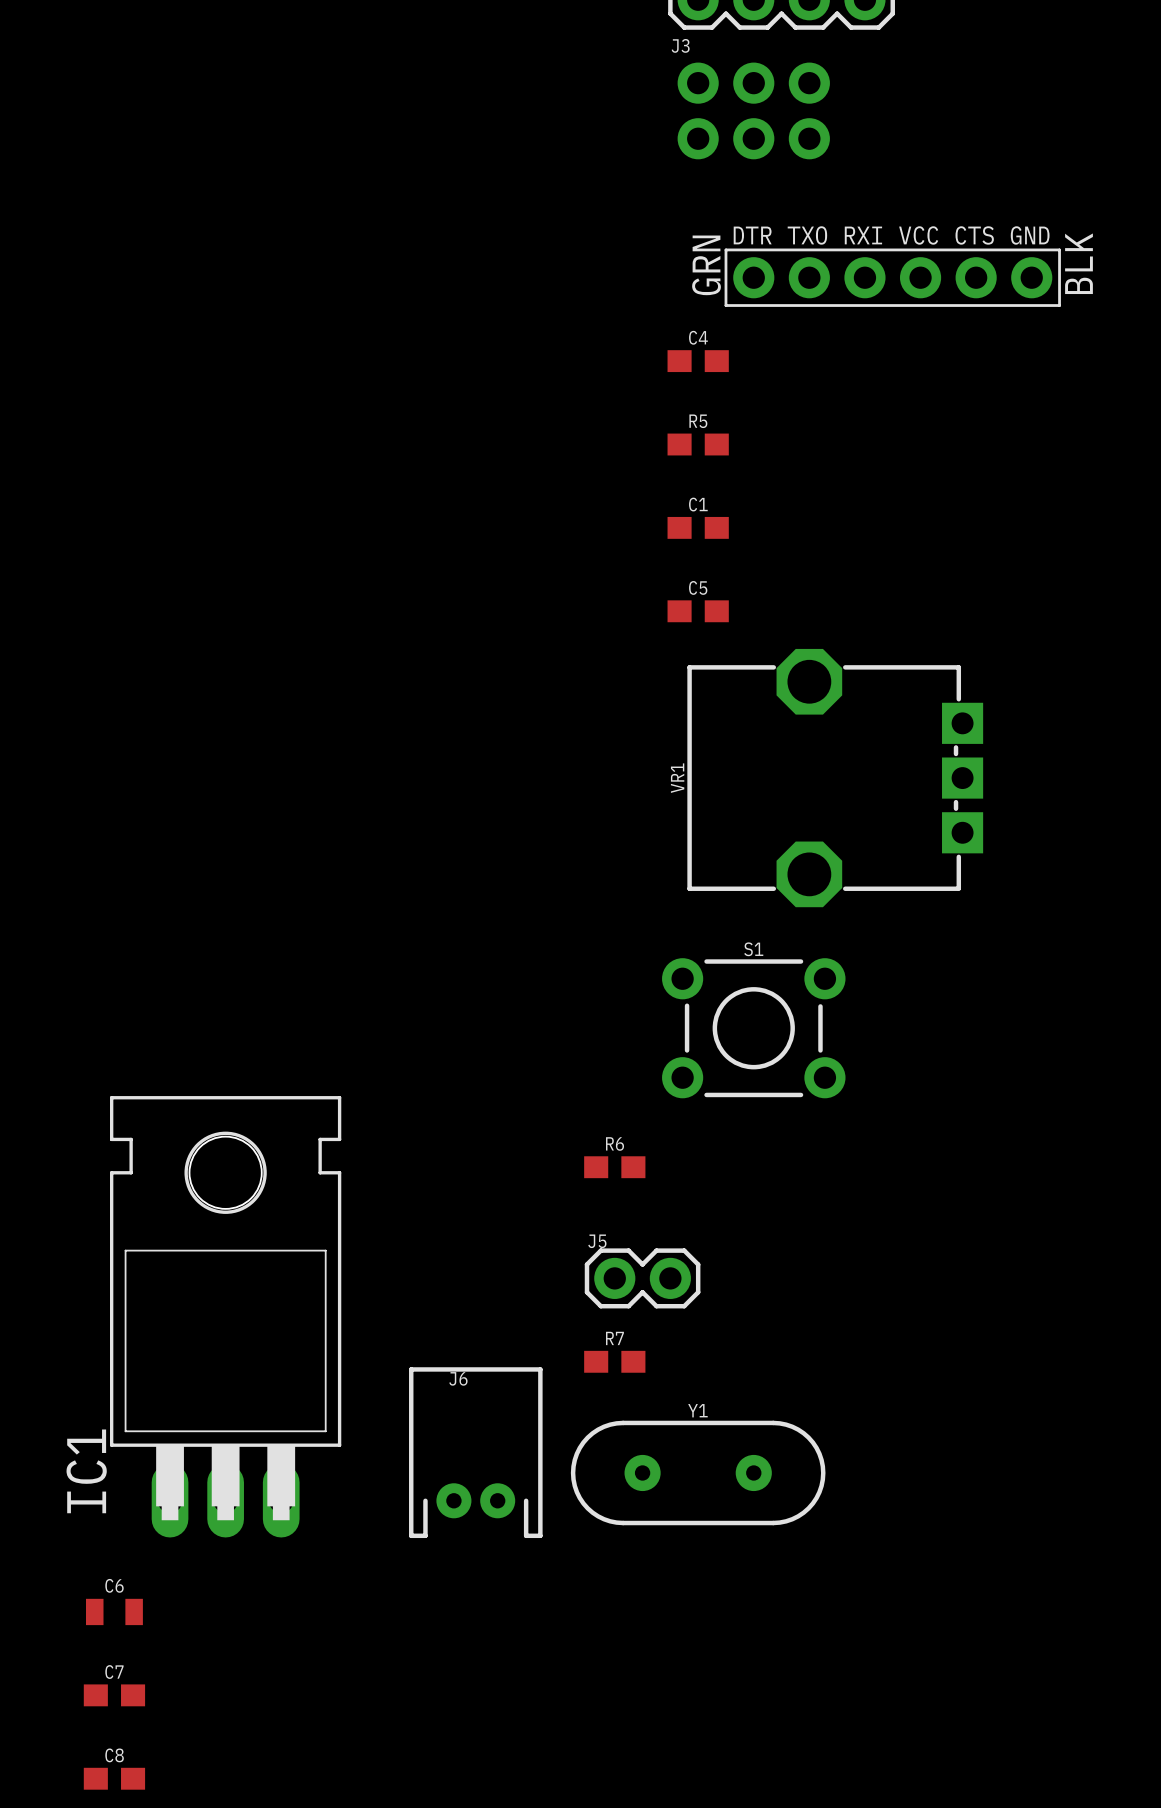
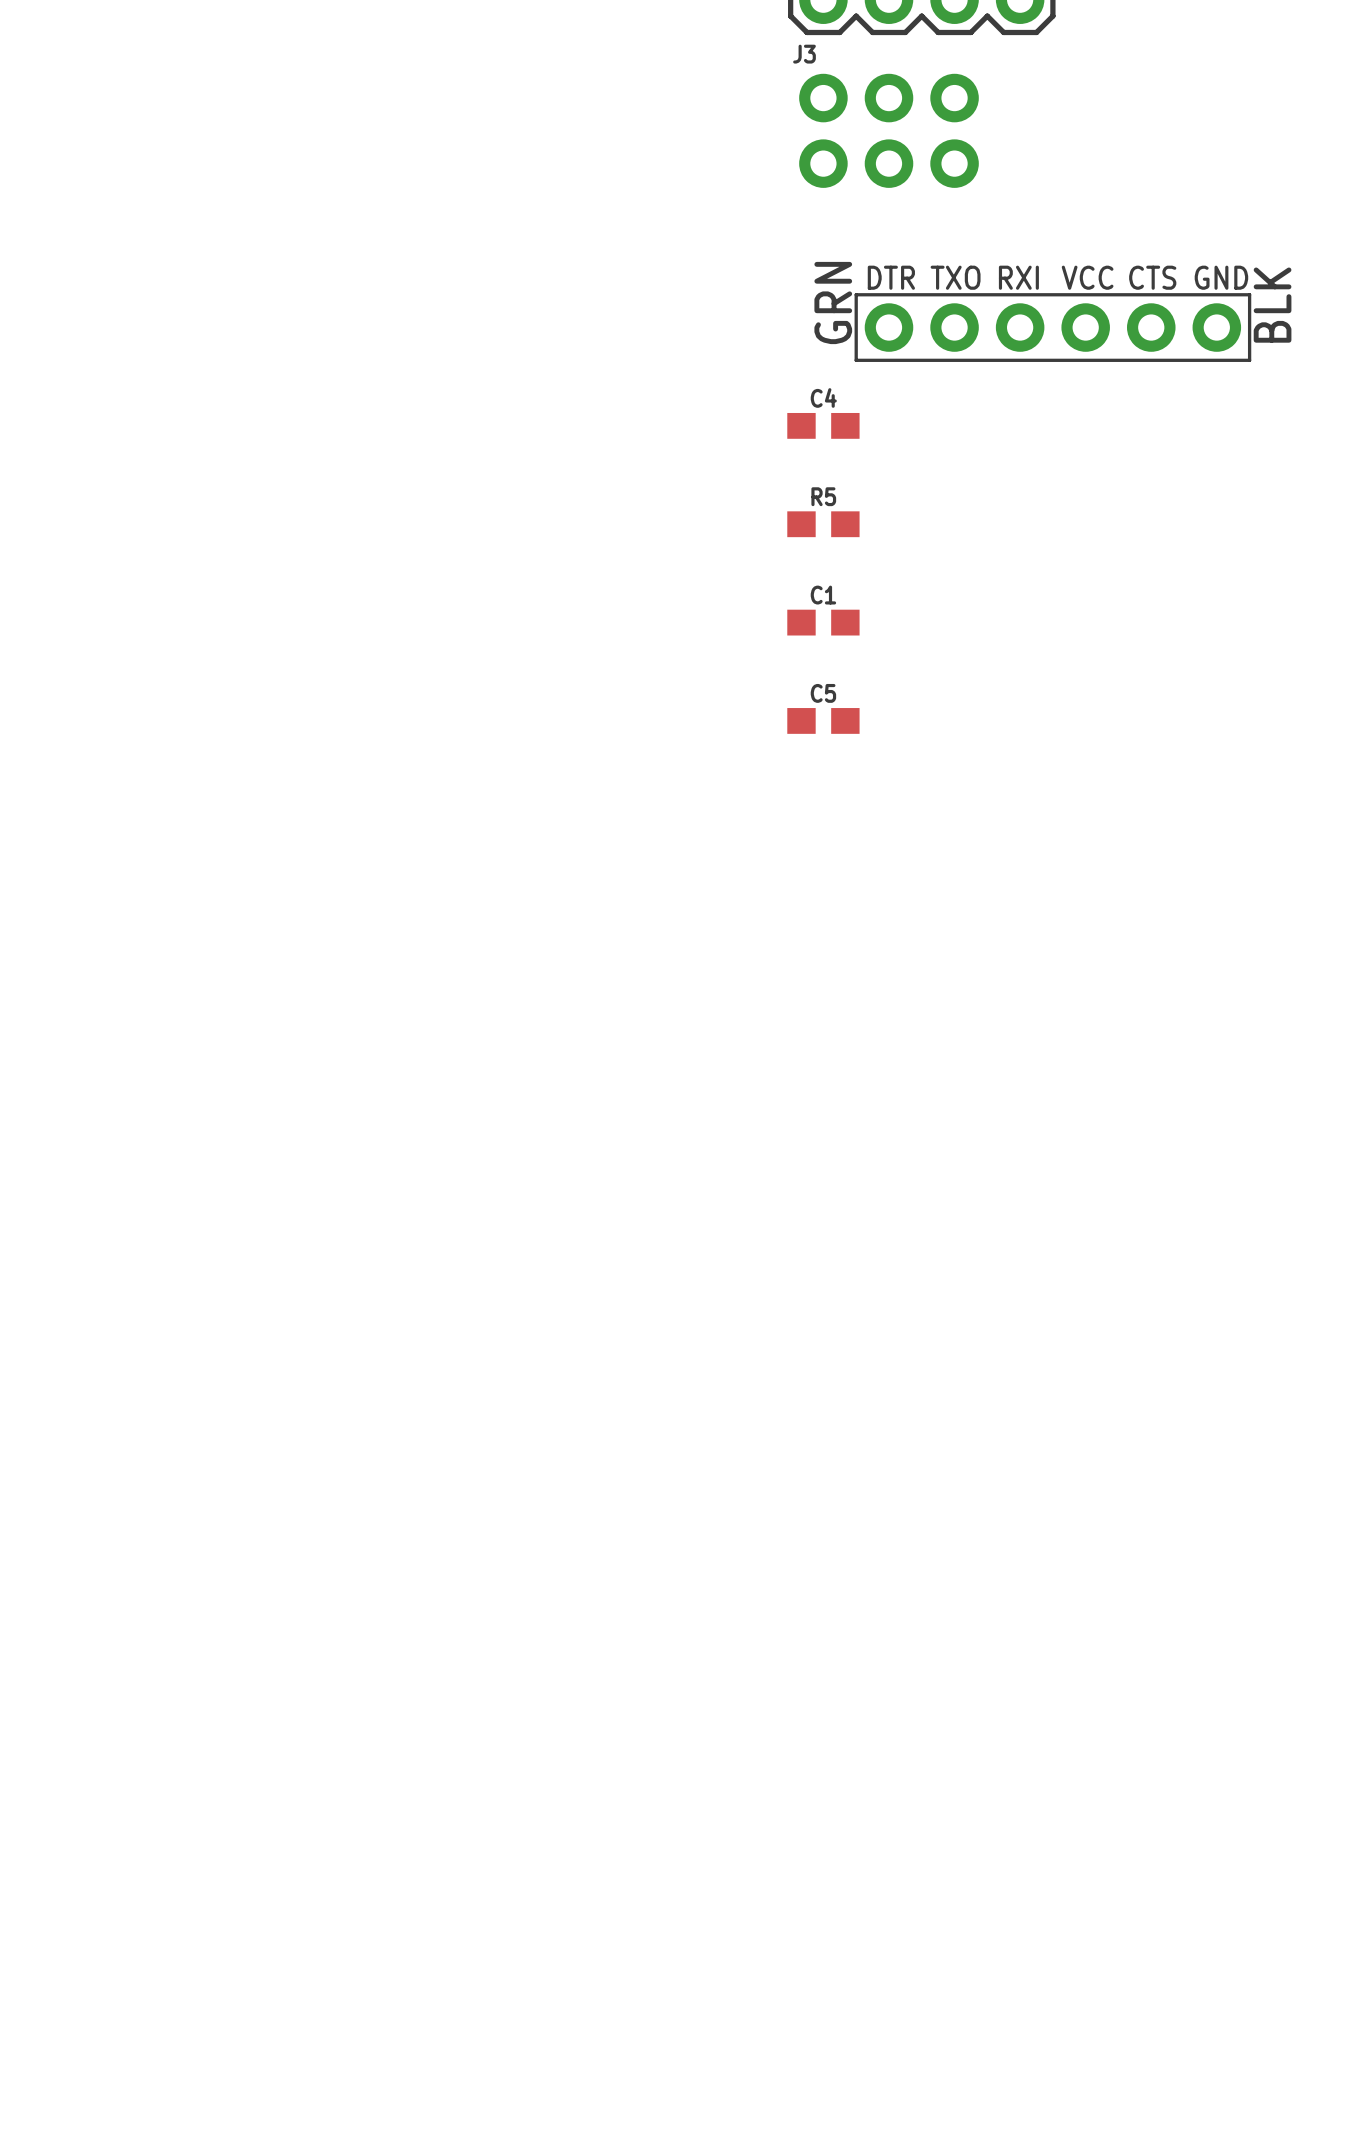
VR1: (835, 778) -> none
S1: (753, 1028) -> none
R6: (614, 1167) -> none
J5: (642, 1278) -> none
IC1: (225, 1316) -> none
R7: (614, 1361) -> none
J6: (475, 1452) -> none
Y1: (698, 1472) -> none
C6: (114, 1611) -> none
C7: (114, 1695) -> none
C8: (114, 1778) -> none

